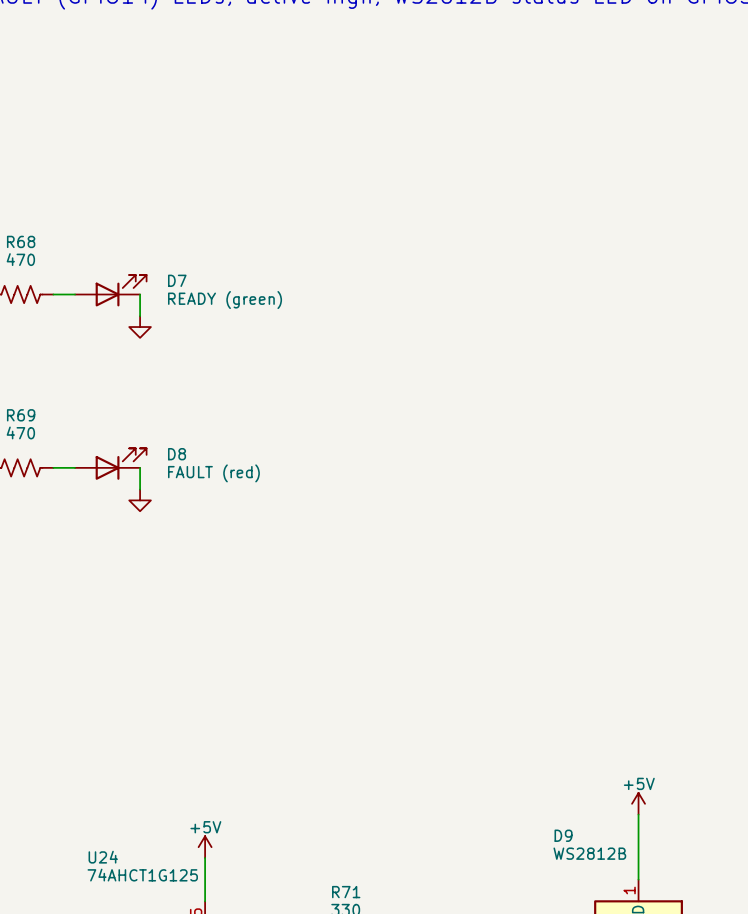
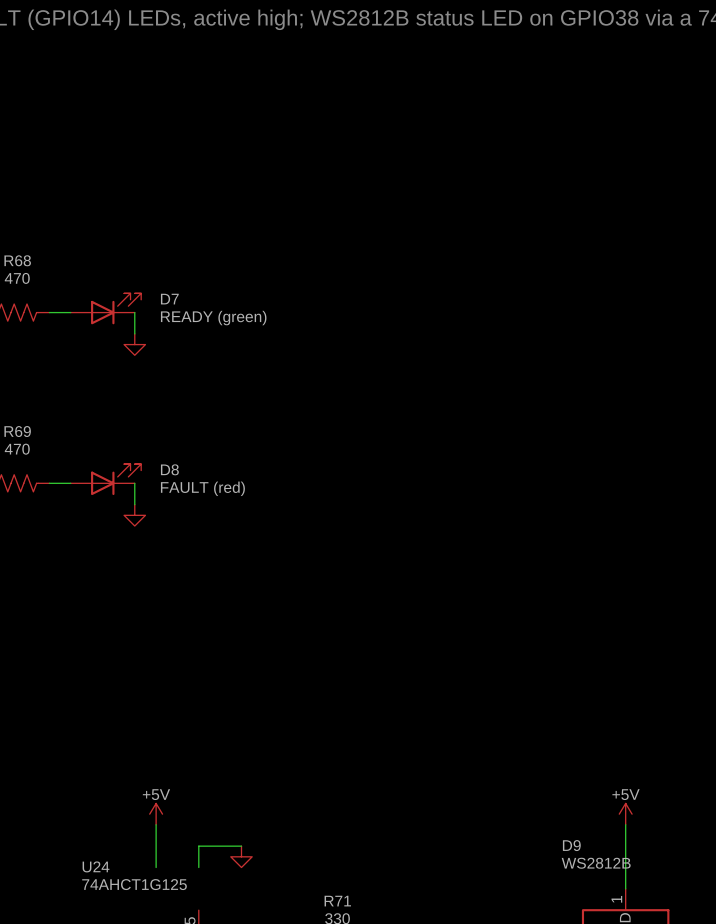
wire: none -> (156, 824) (156, 867)
D9 name position: D9 (563, 835) -> D9 (571, 845)
power symbol position: +5V (205, 847) -> +5V (156, 814)
power symbol: none -> (241, 856)
D9 value position: WS2812B (589, 853) -> WS2812B (596, 863)
wire: (205, 857) (205, 901) -> (198, 867) (198, 846) (241, 846)

